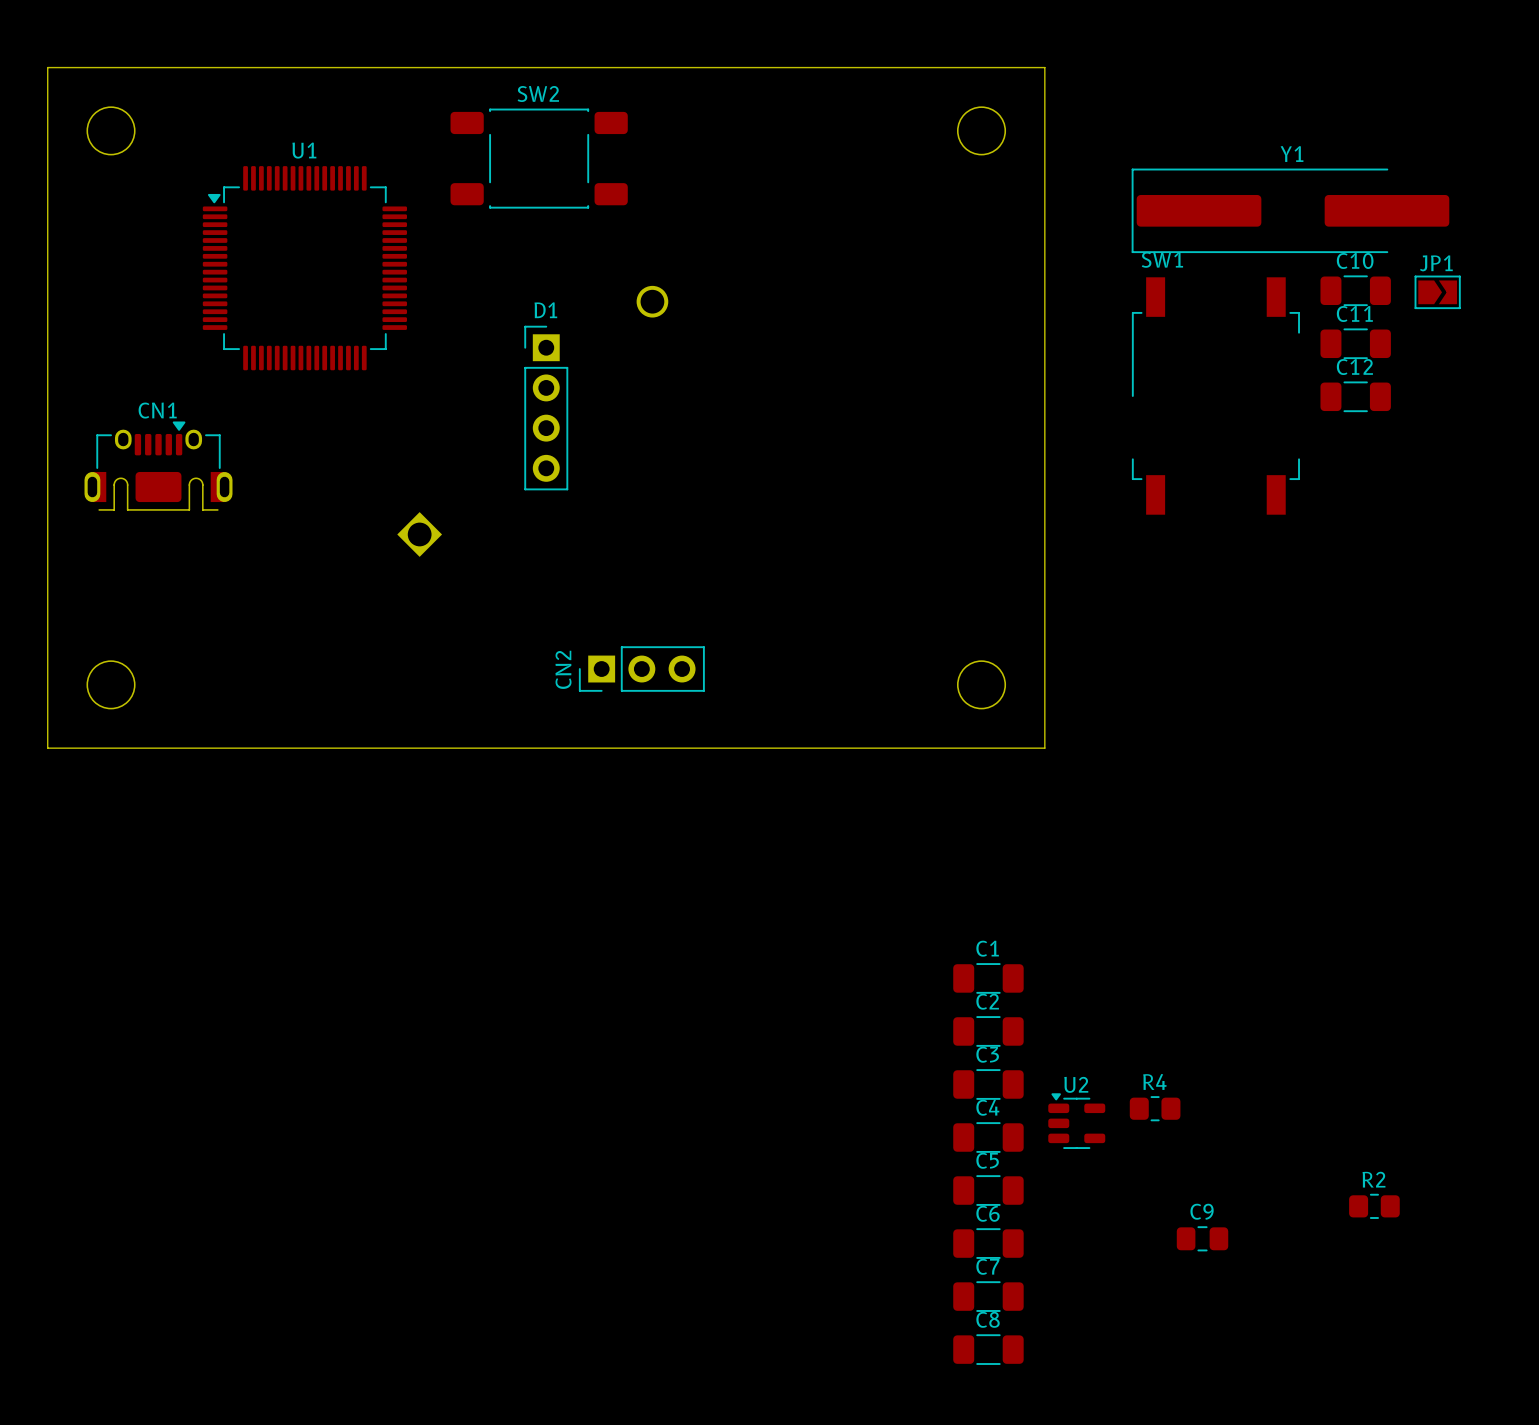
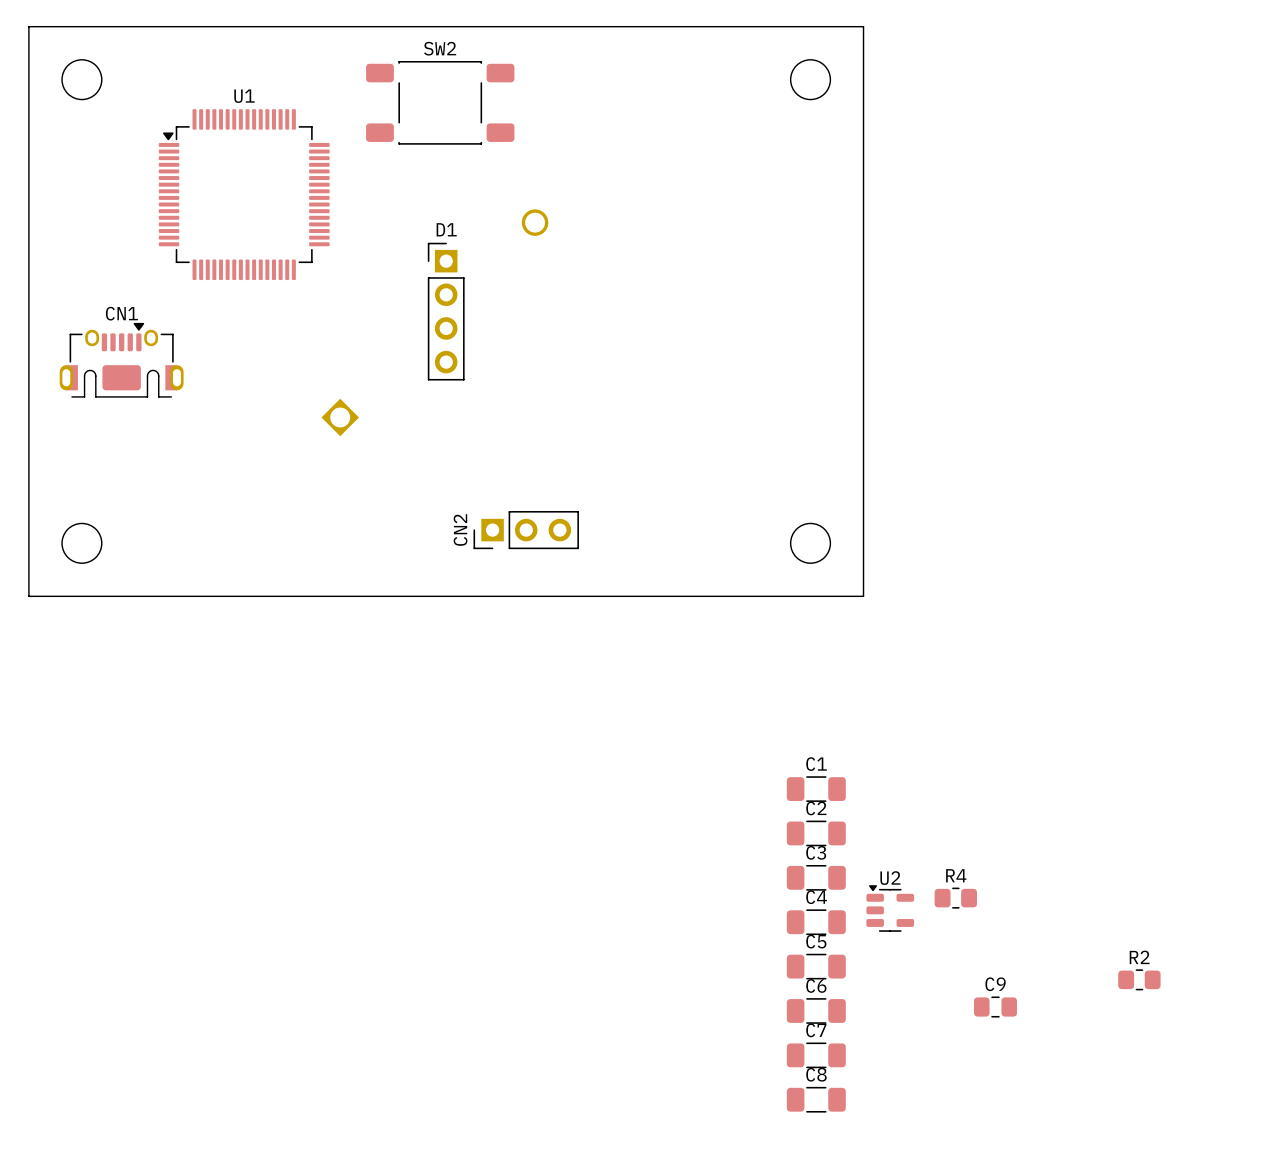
Y1: (1290, 210) -> none
C10: (1355, 290) -> none
JP1: (1437, 292) -> none
C11: (1355, 343) -> none
SW1: (1215, 396) -> none
C12: (1355, 396) -> none

